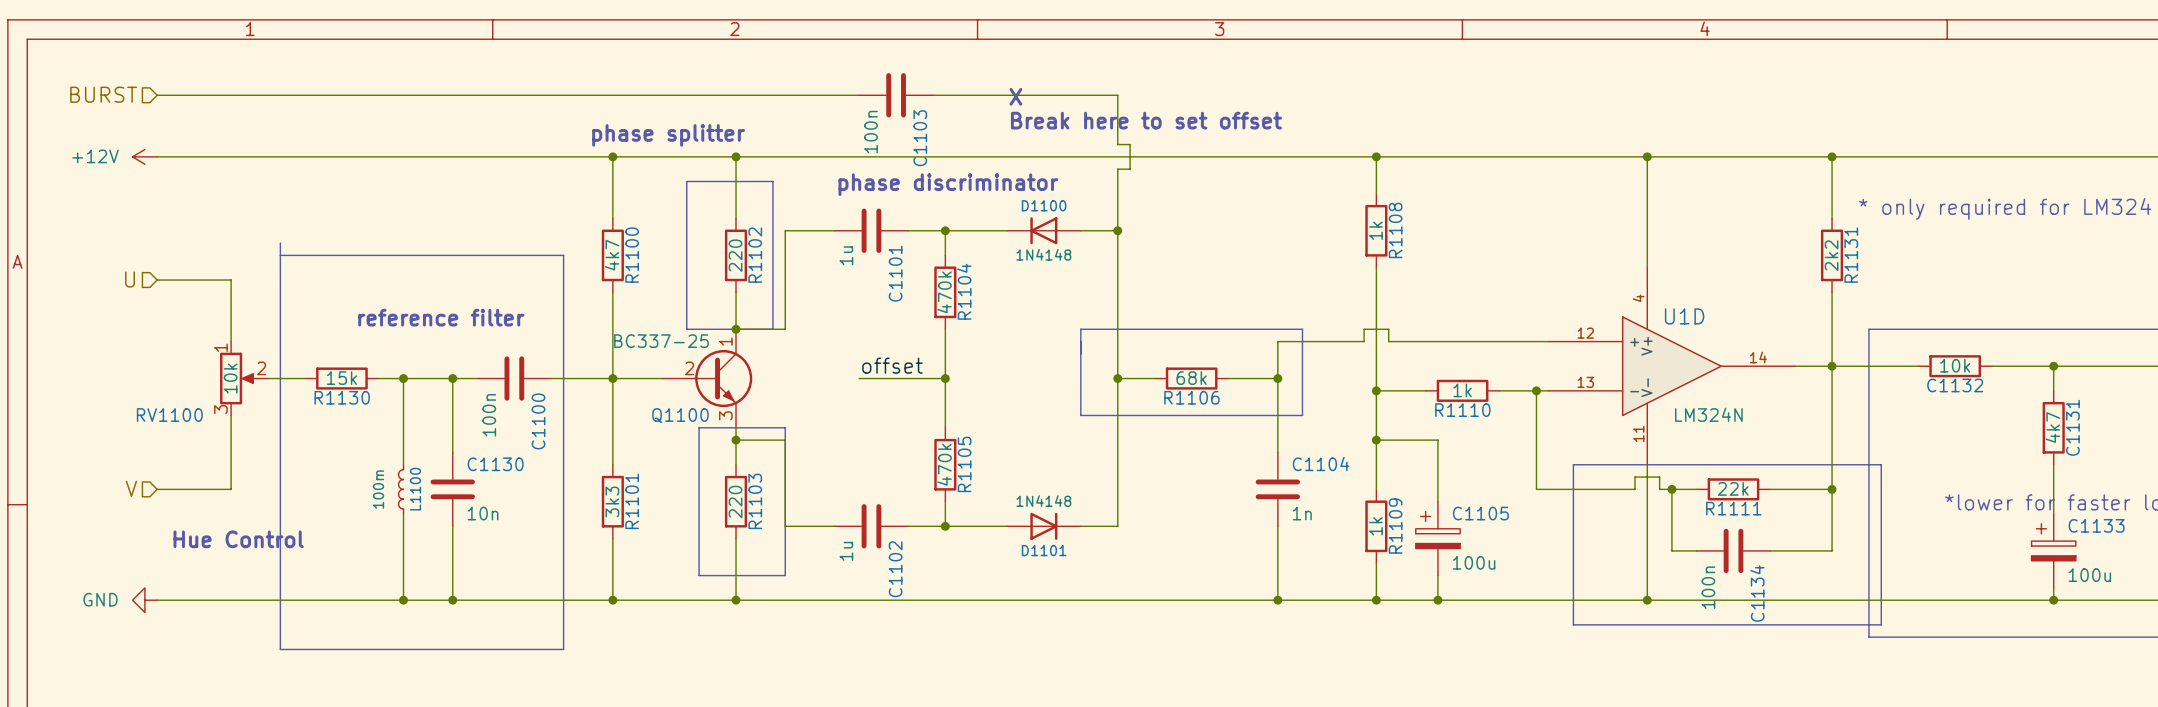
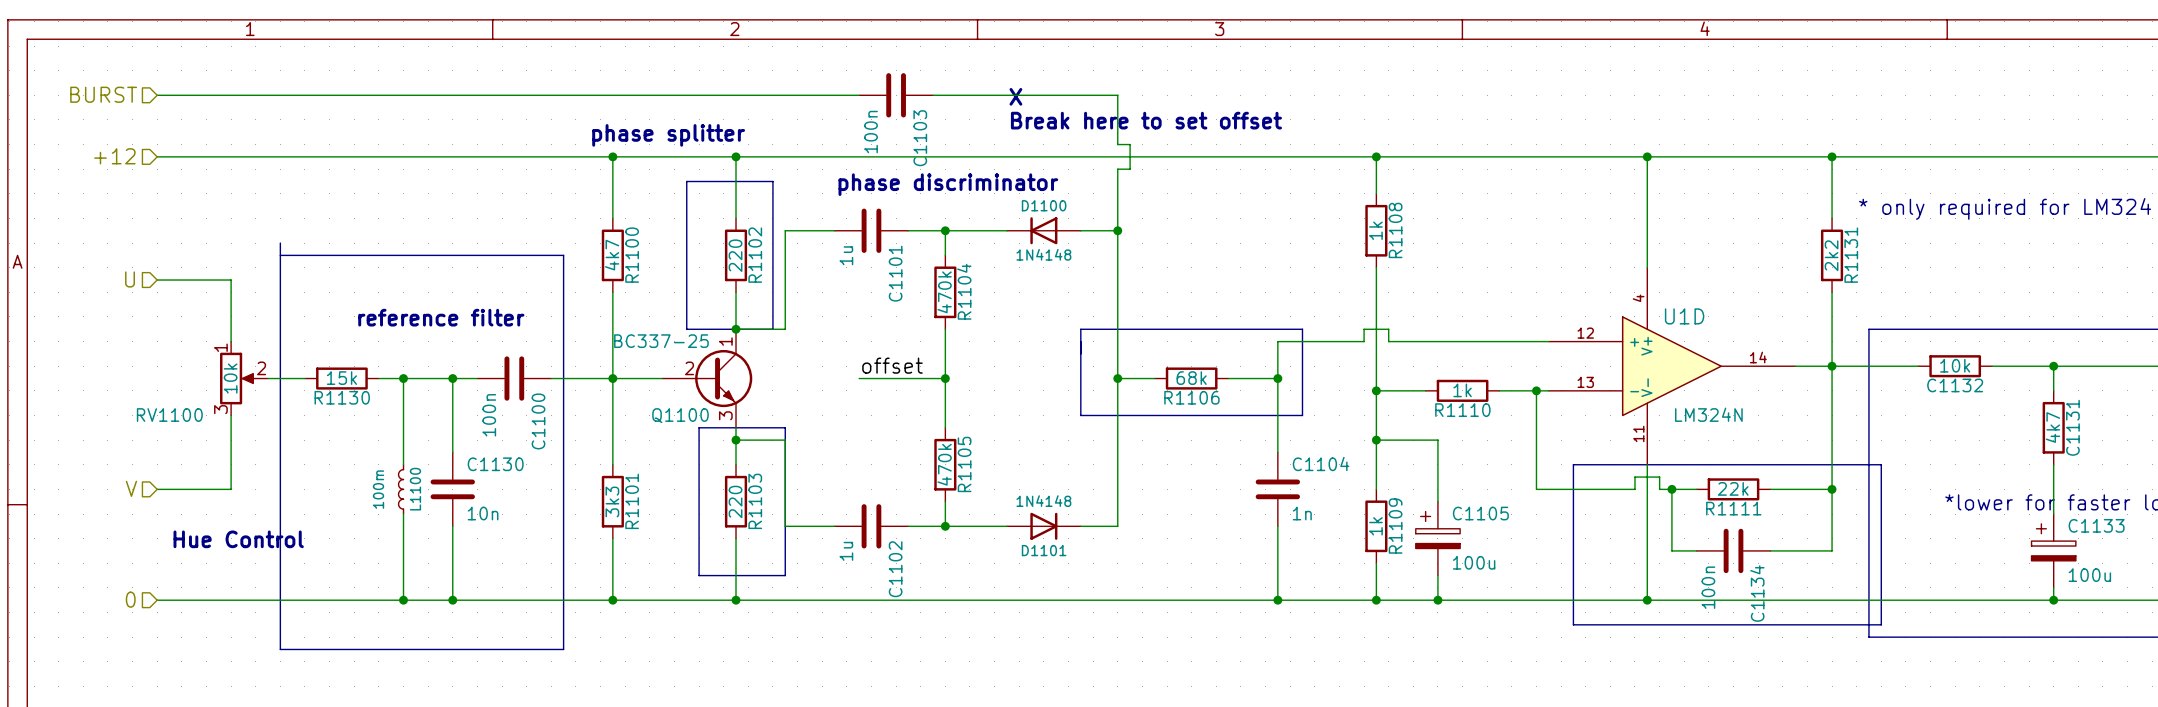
hierarchical label: none -> +12 (114, 156)
power symbol: +12V (144, 156) -> none
hierarchical label: none -> 0 (130, 599)
power symbol: GND (144, 600) -> none

